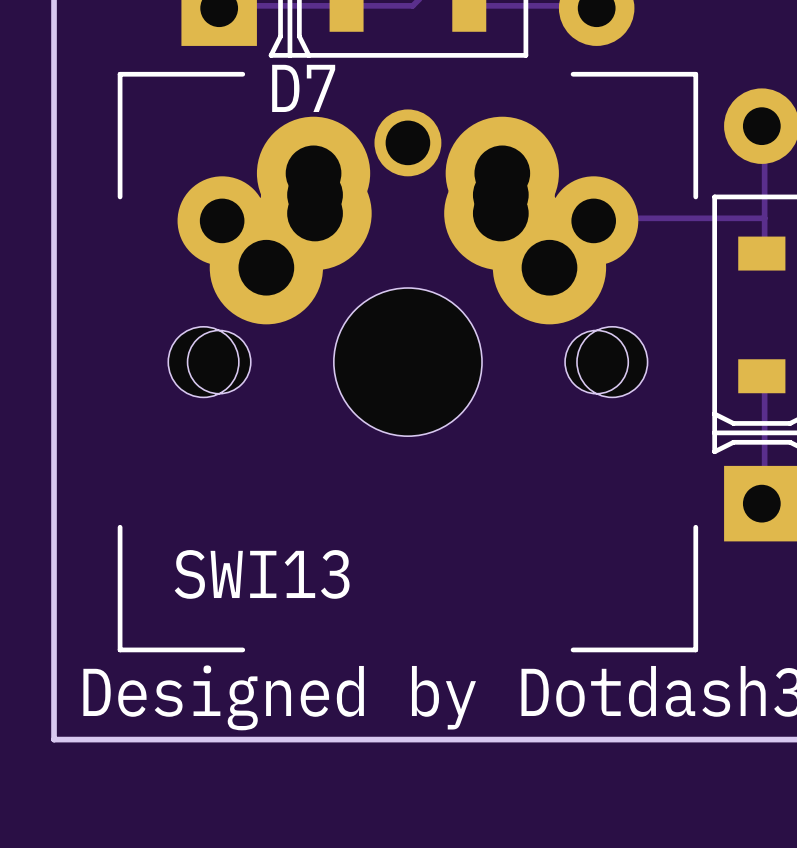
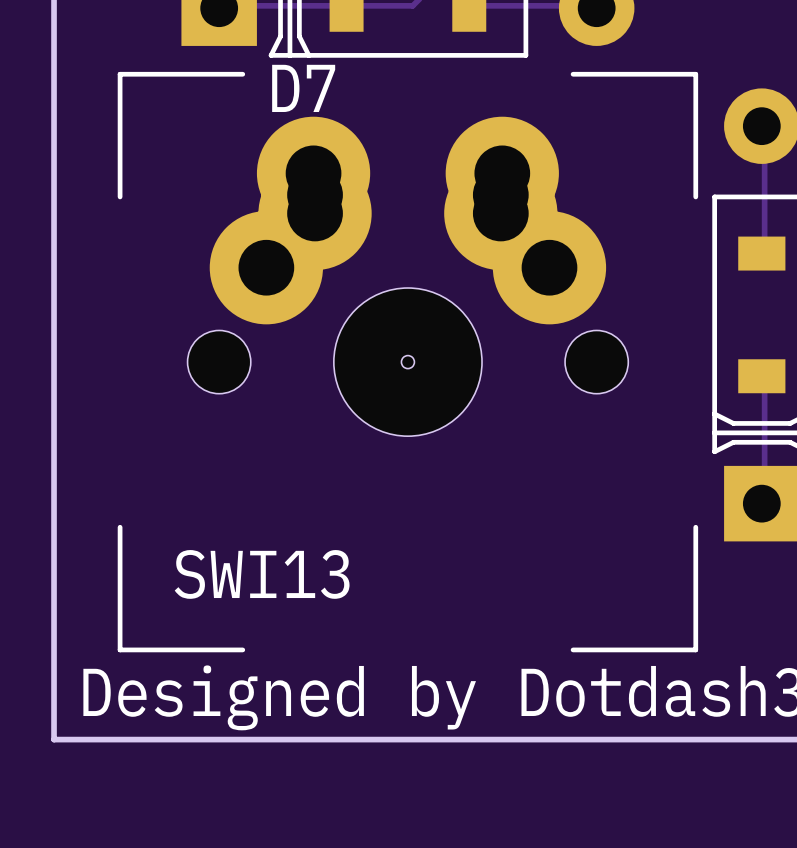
SWI13 footprint: [117, 71, 699, 653] -> [117, 71, 699, 653]
track: (764, 218) (598, 218) (593, 220) (592, 224) (552, 264) -> none

